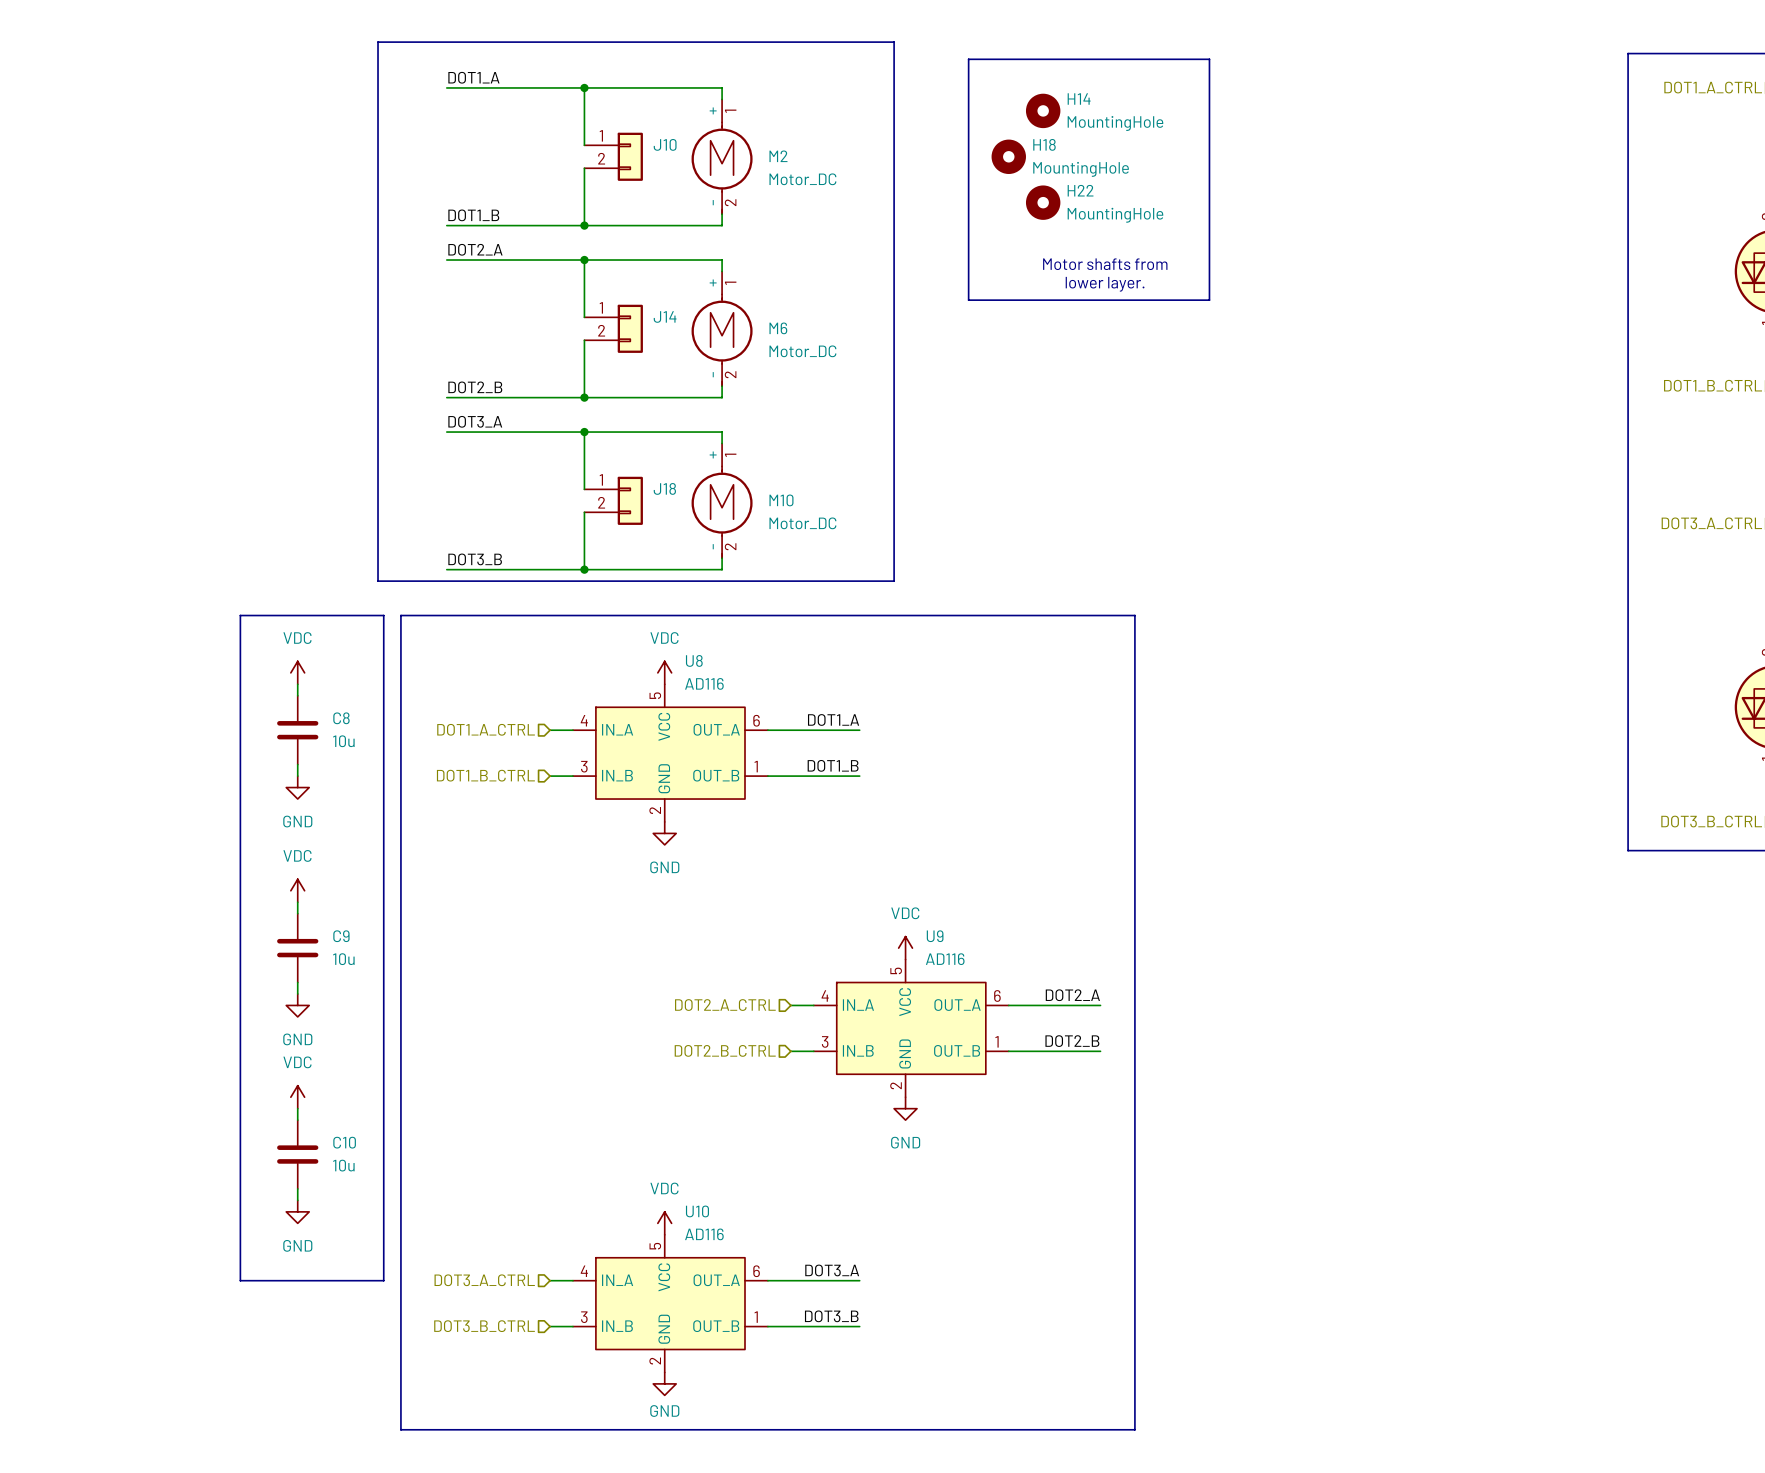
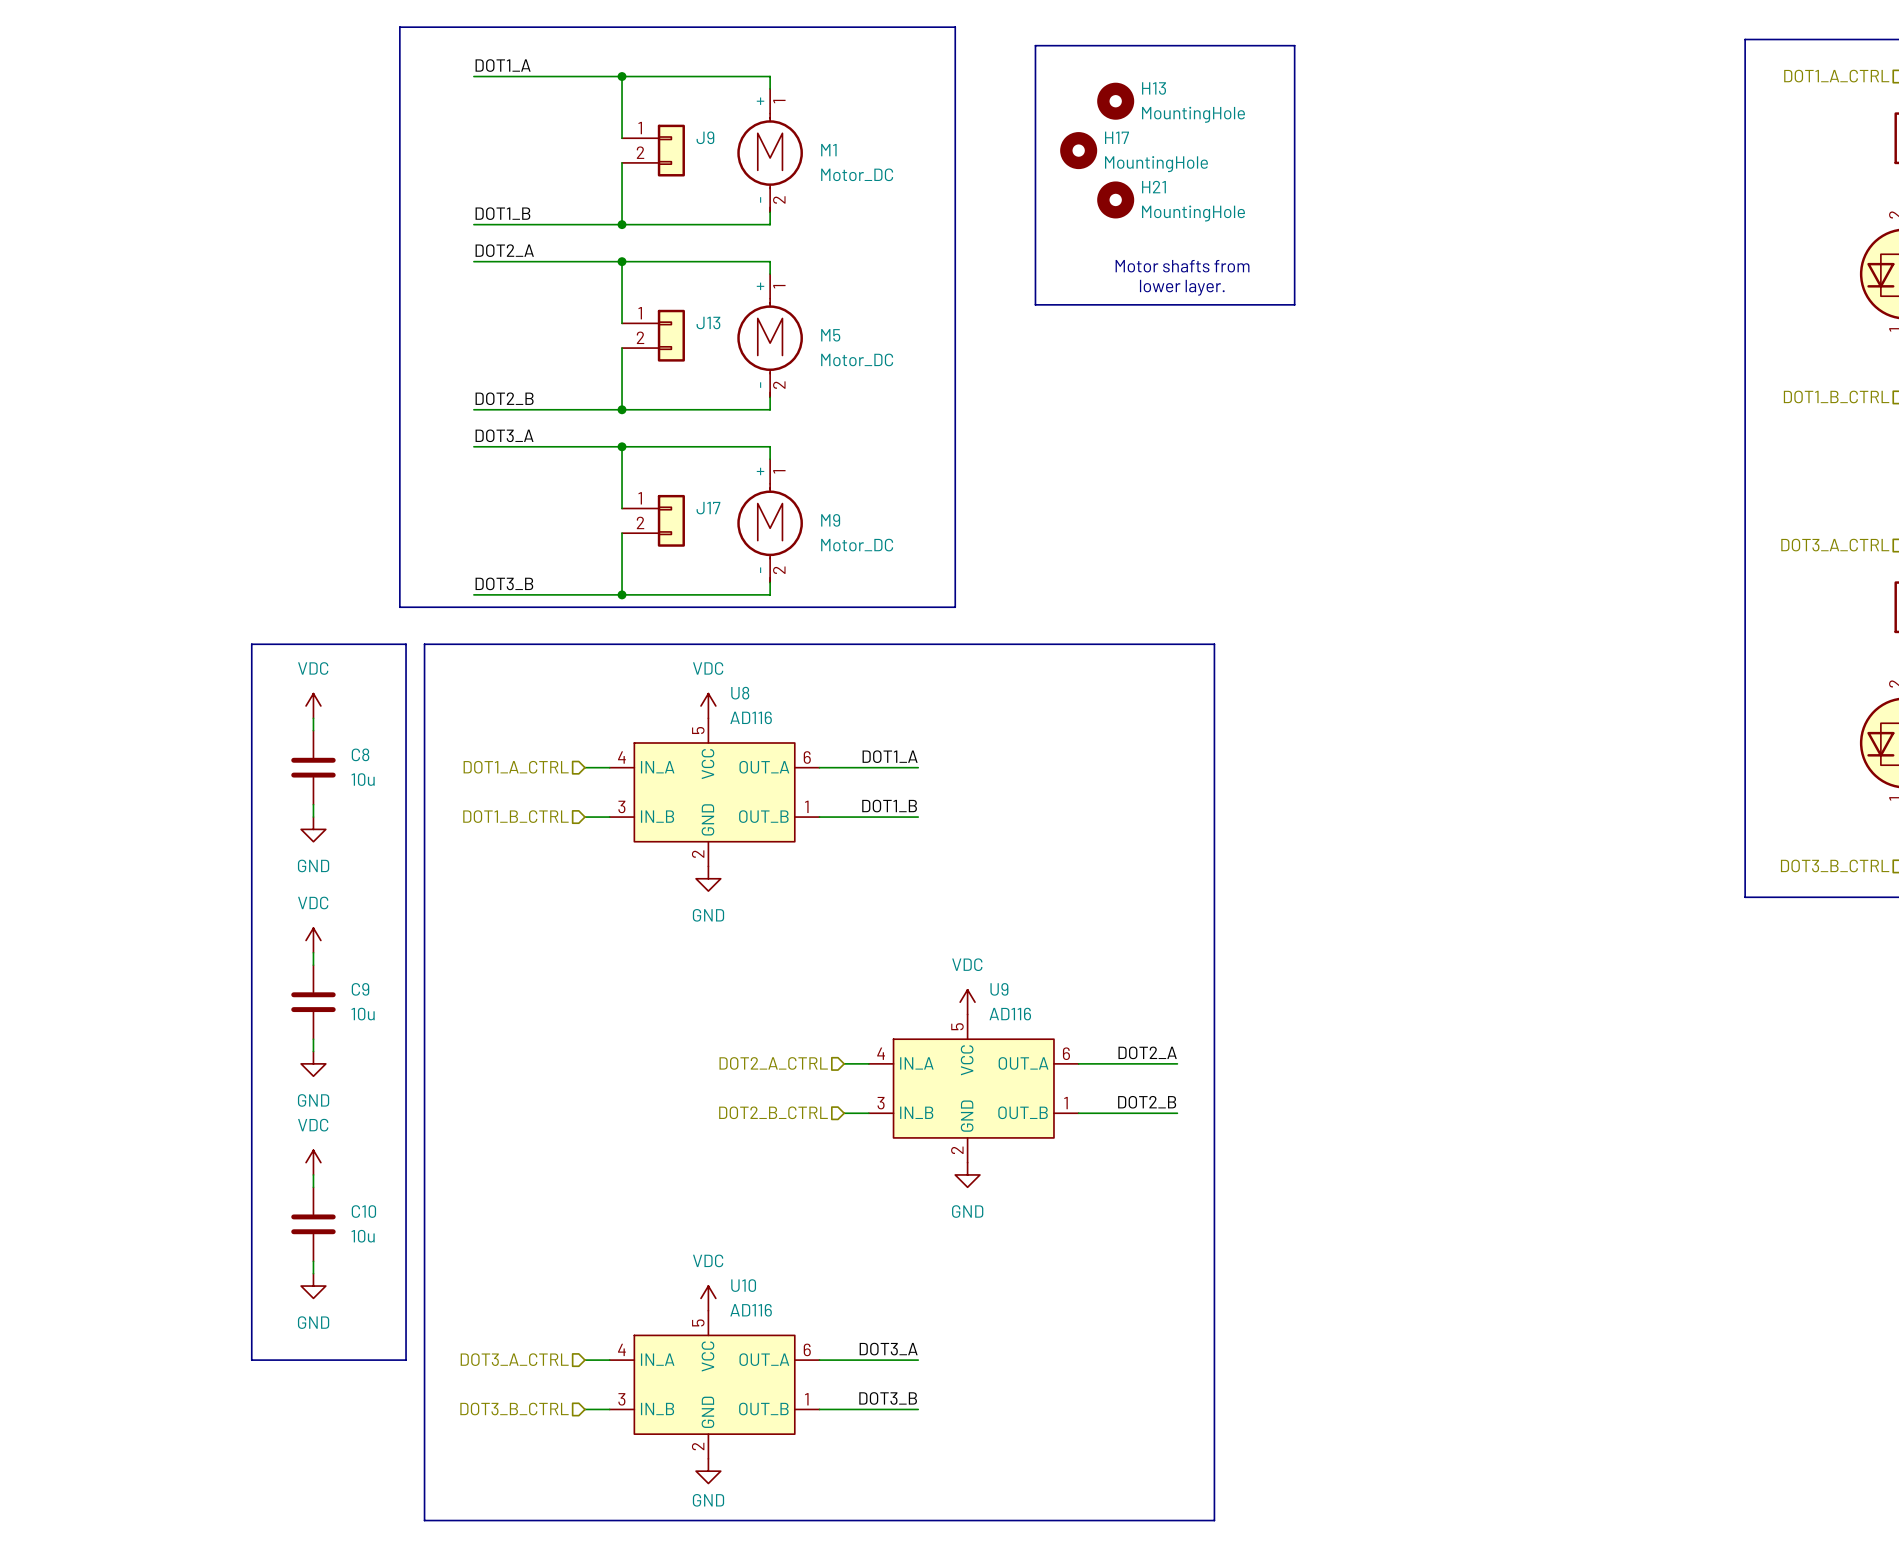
H14 name: H14 (1079, 99) -> H13 (1154, 88)
J10 name: J10 (665, 144) -> J9 (705, 137)
H18 name: H18 (1044, 144) -> H17 (1117, 137)
M2 name: M2 (778, 156) -> M1 (828, 150)
H22 name: H22 (1080, 190) -> H21 (1153, 187)
J14 name: J14 (665, 316) -> J13 (708, 322)
M6 name: M6 (778, 328) -> M5 (830, 335)
J18 name: J18 (664, 488) -> J17 (708, 508)
M10 name: M10 (781, 500) -> M9 (830, 520)

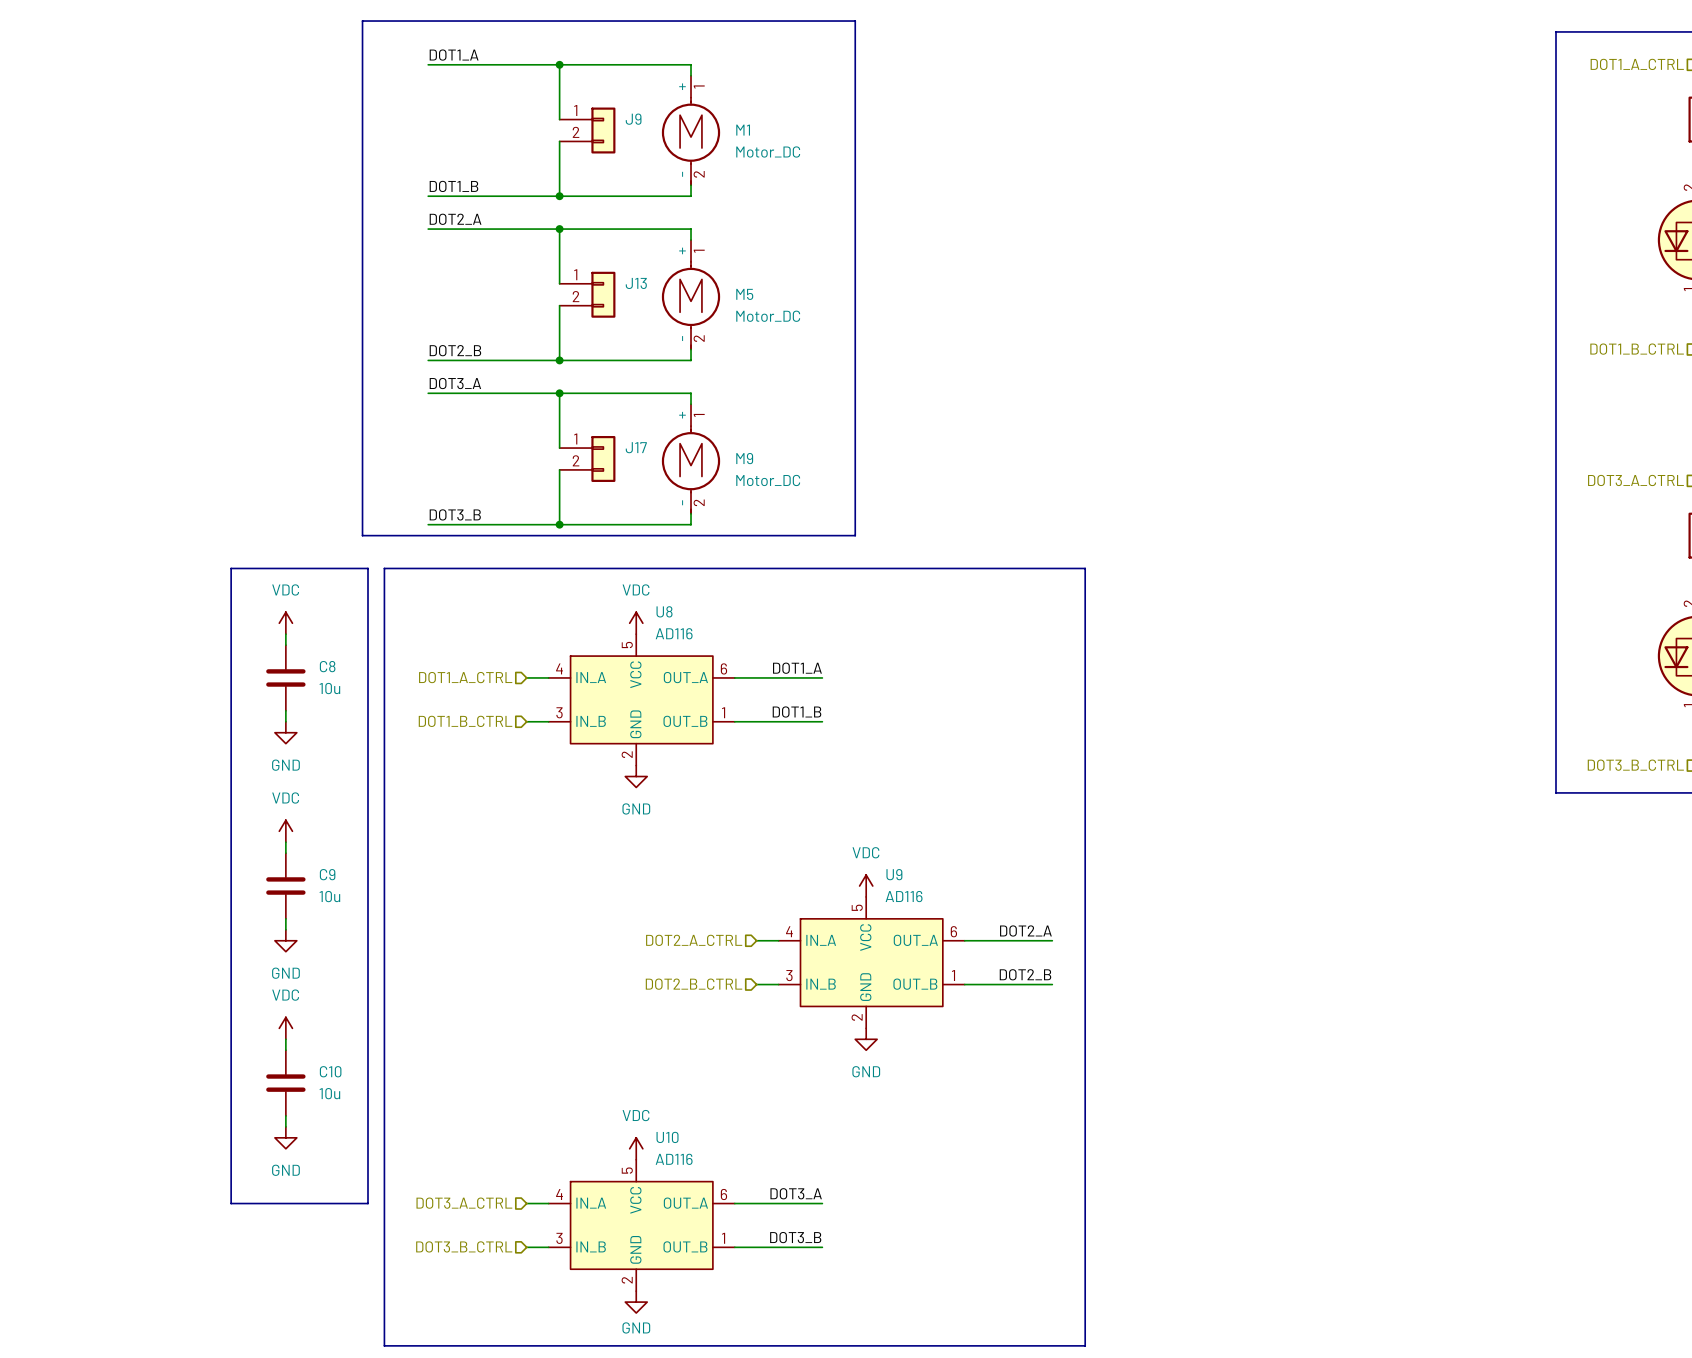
line: (1035, 45) (1294, 45) (1294, 304) (1035, 304) (1035, 45) -> none
H13: MountingHole (1115, 101) -> none
H17: MountingHole (1078, 150) -> none
H21: MountingHole (1115, 199) -> none
text: Motor shafts from (1182, 266) -> none
text: lower layer. (1182, 287) -> none

